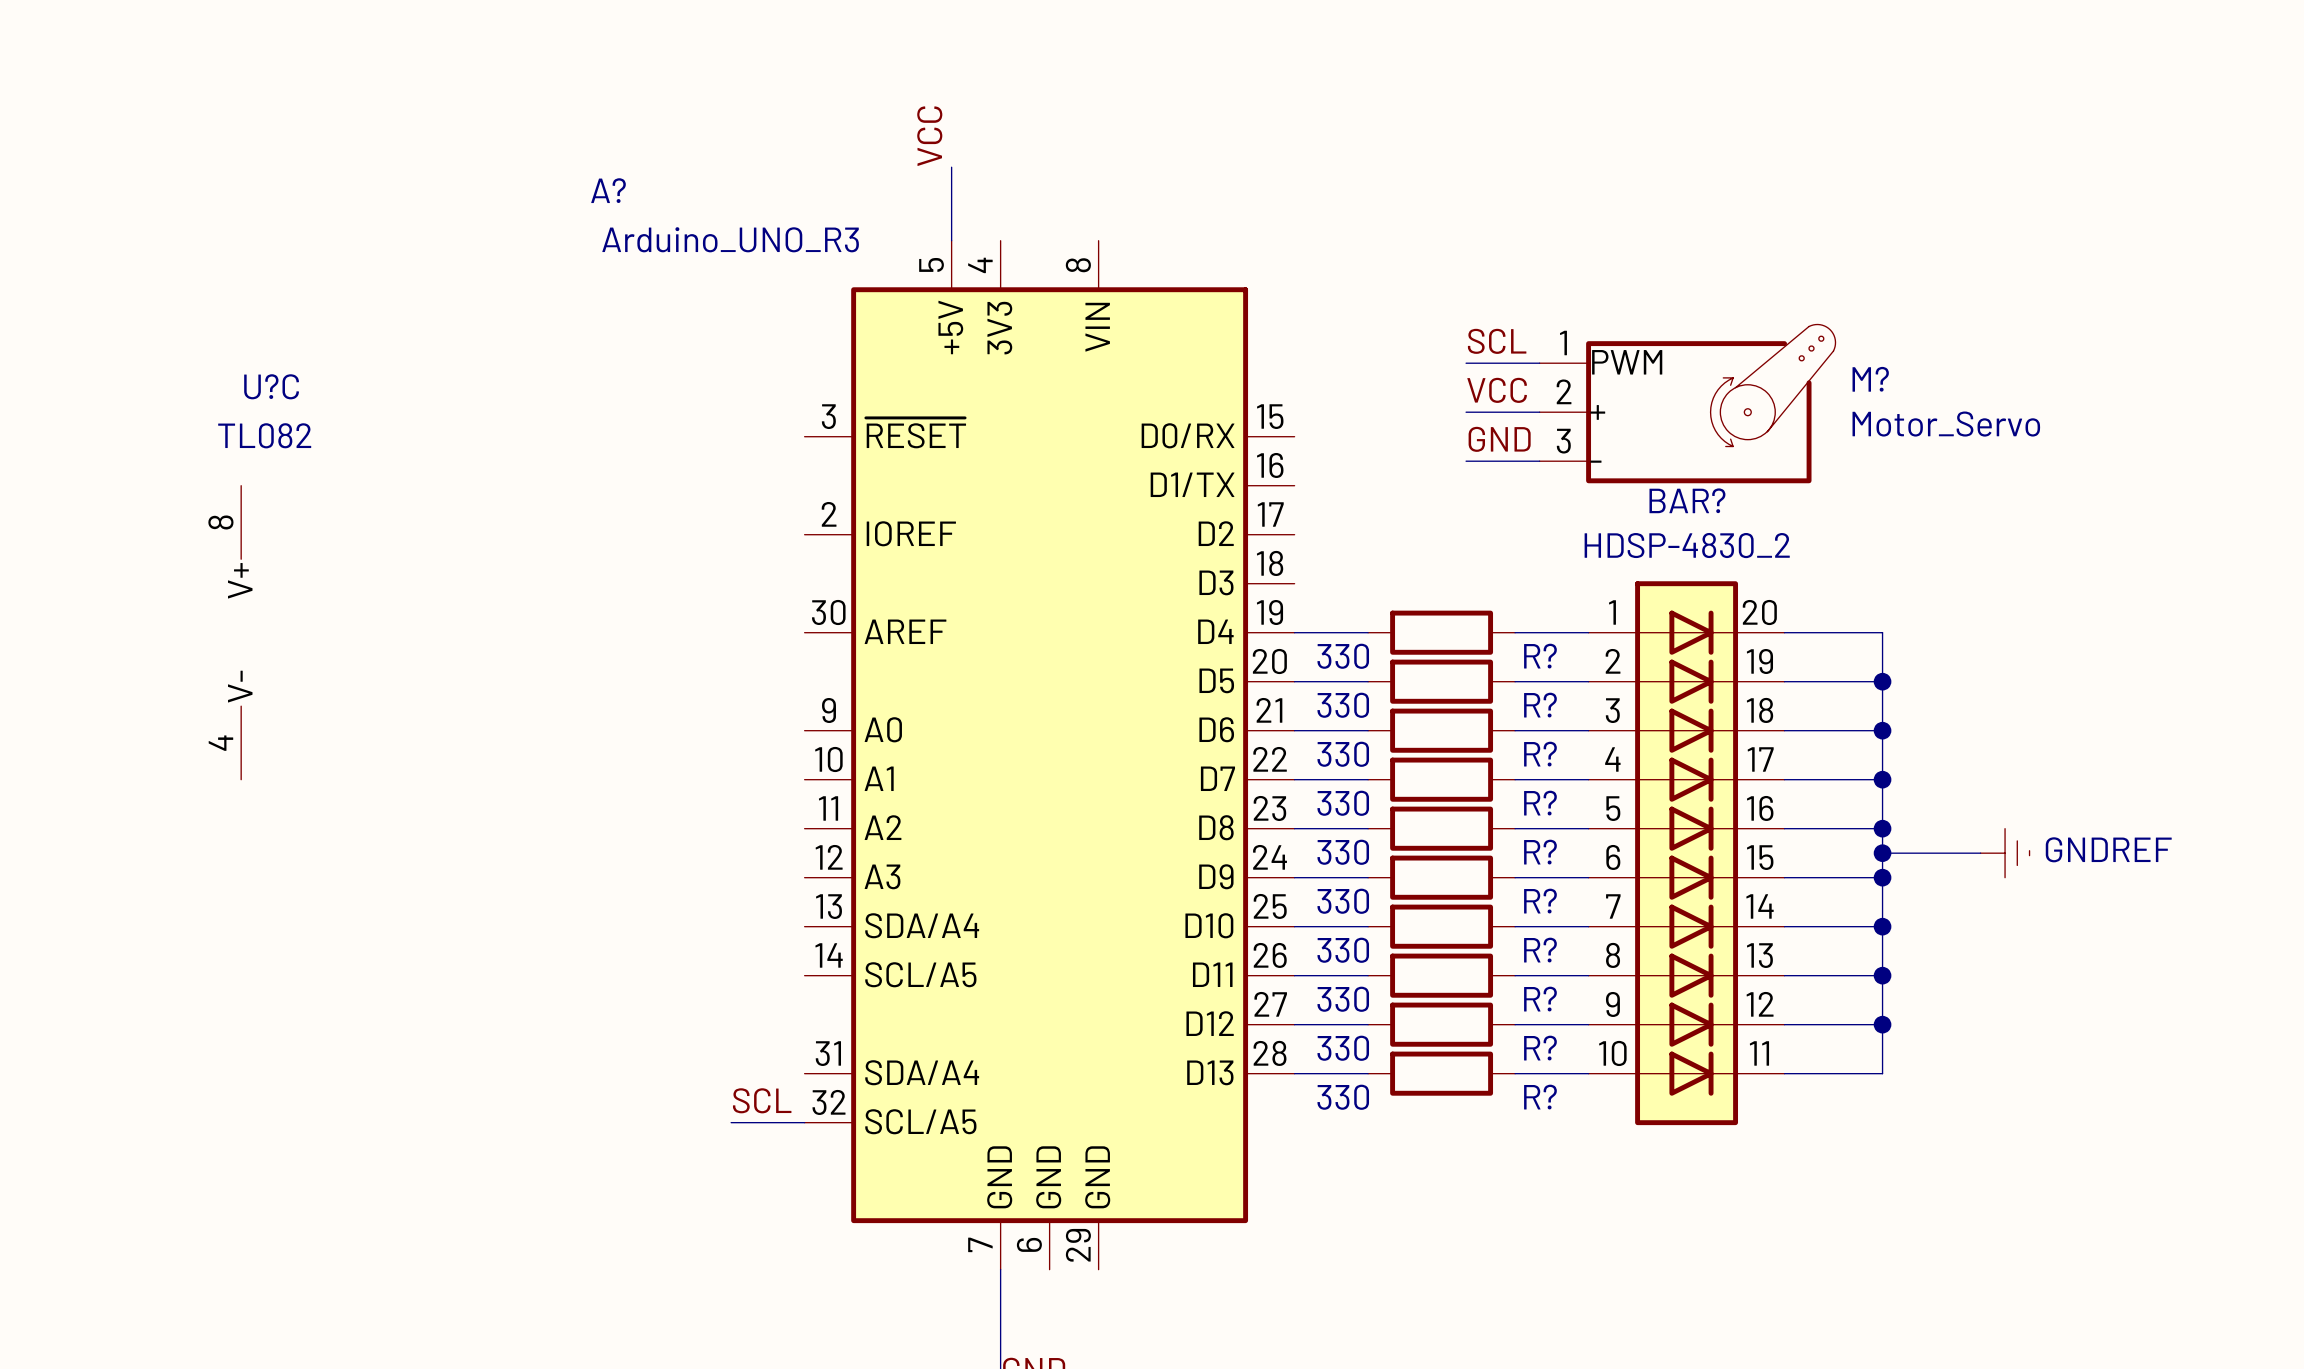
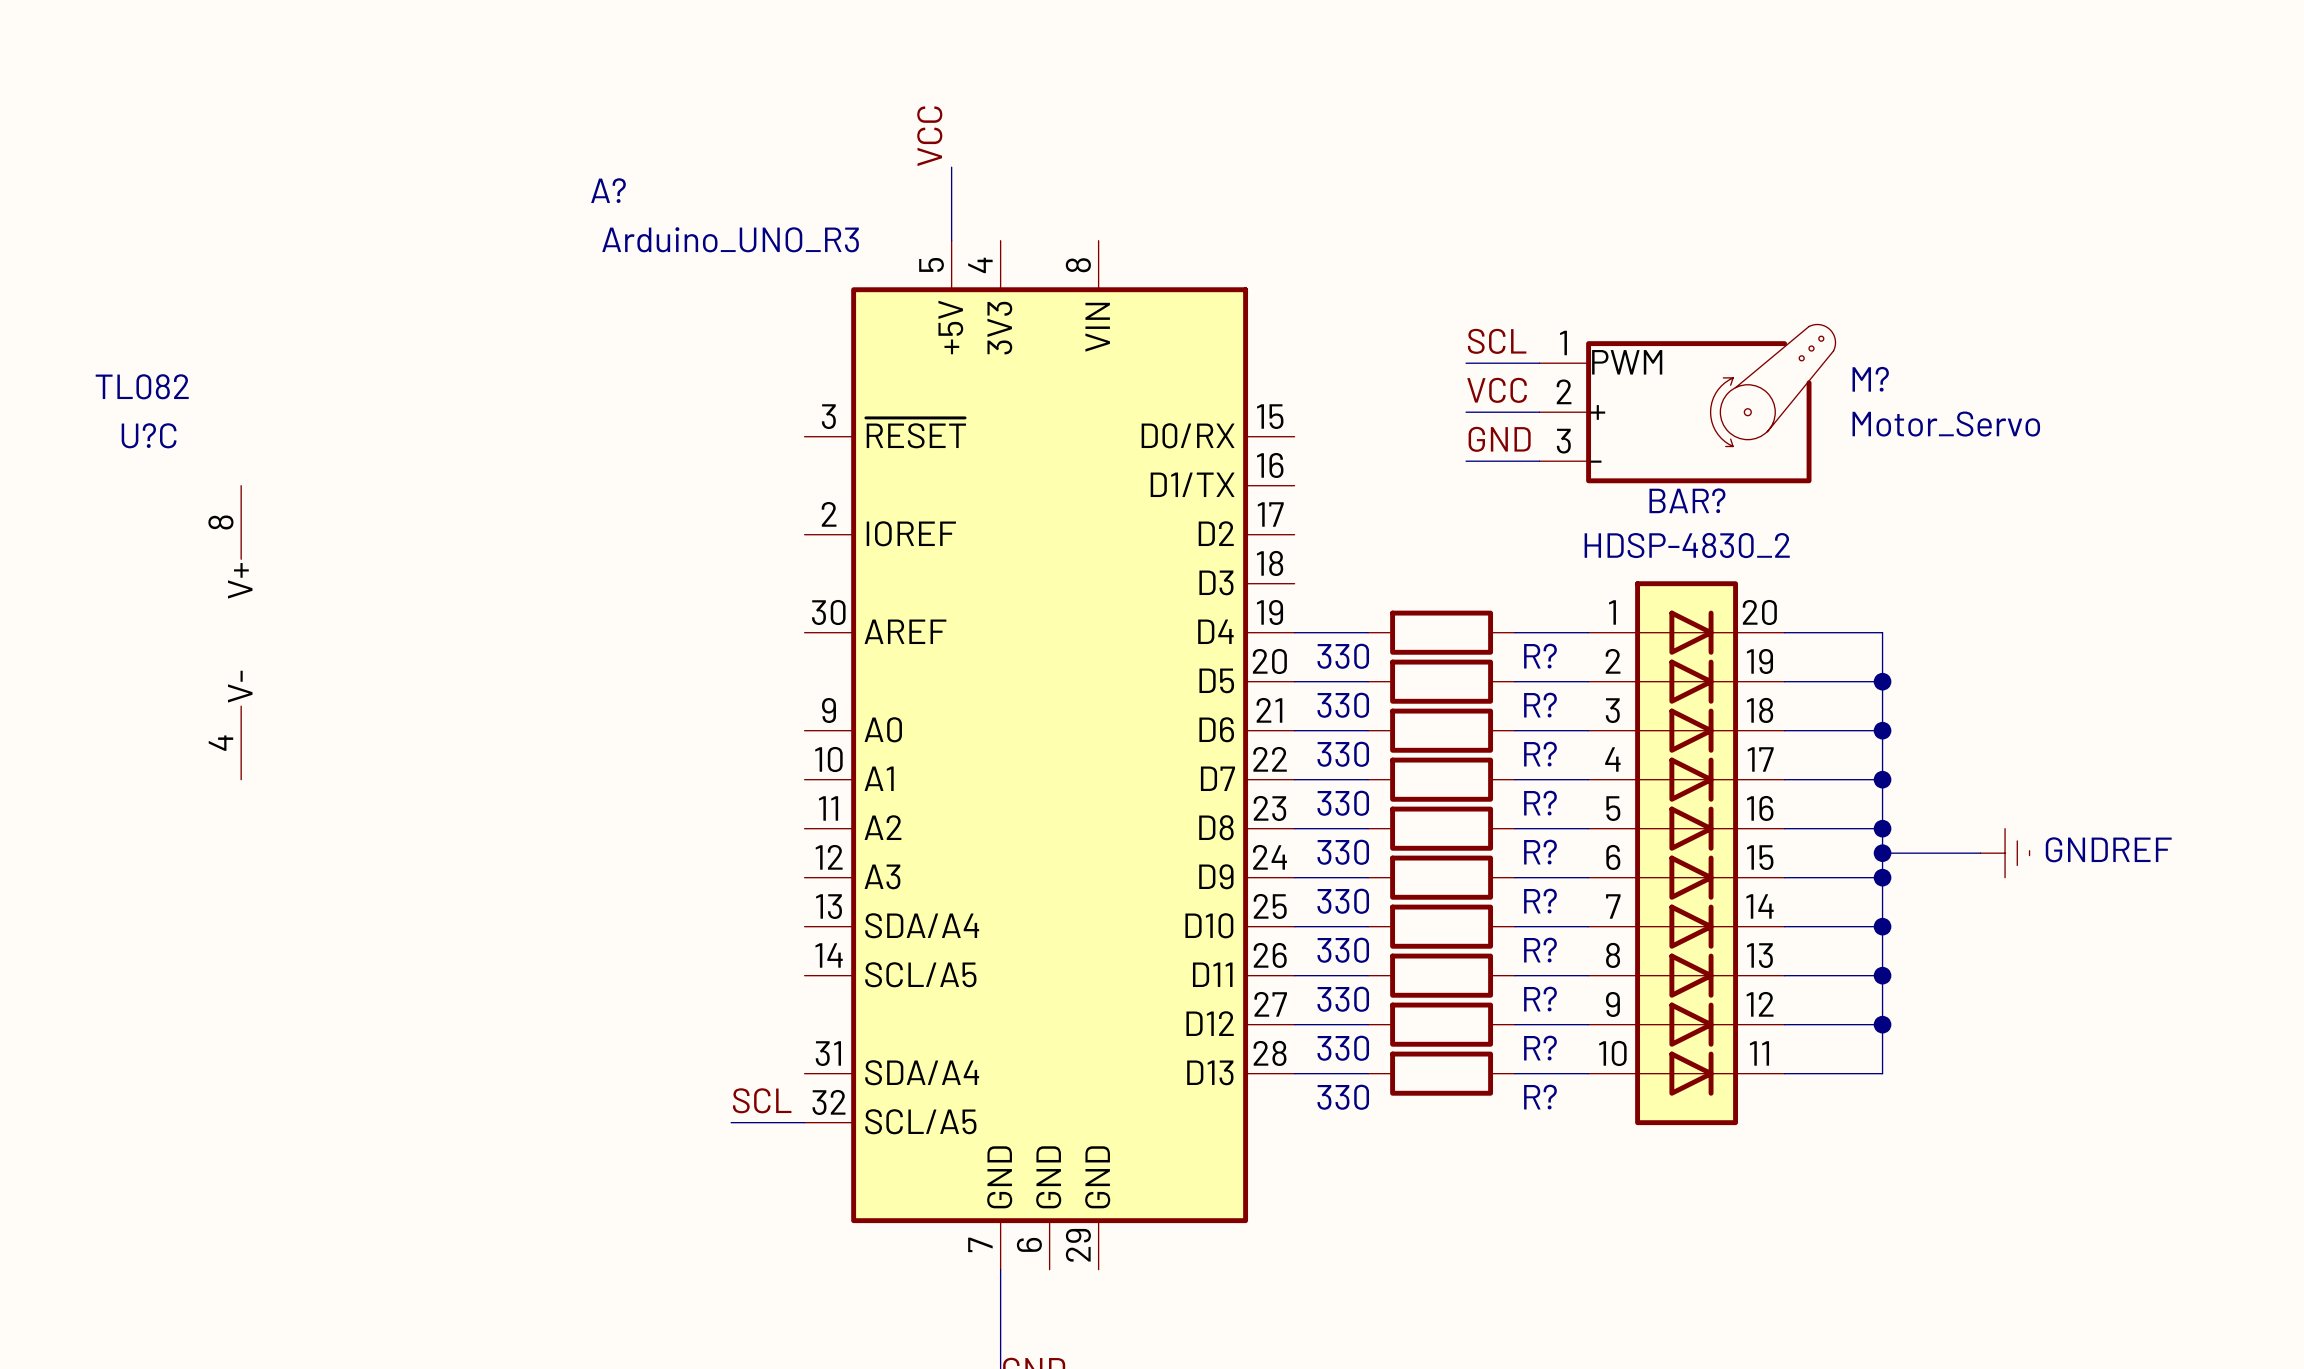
U?C name position: U?C (271, 386) -> U?C (149, 435)
U?C value position: TL082 (264, 435) -> TL082 (142, 386)

